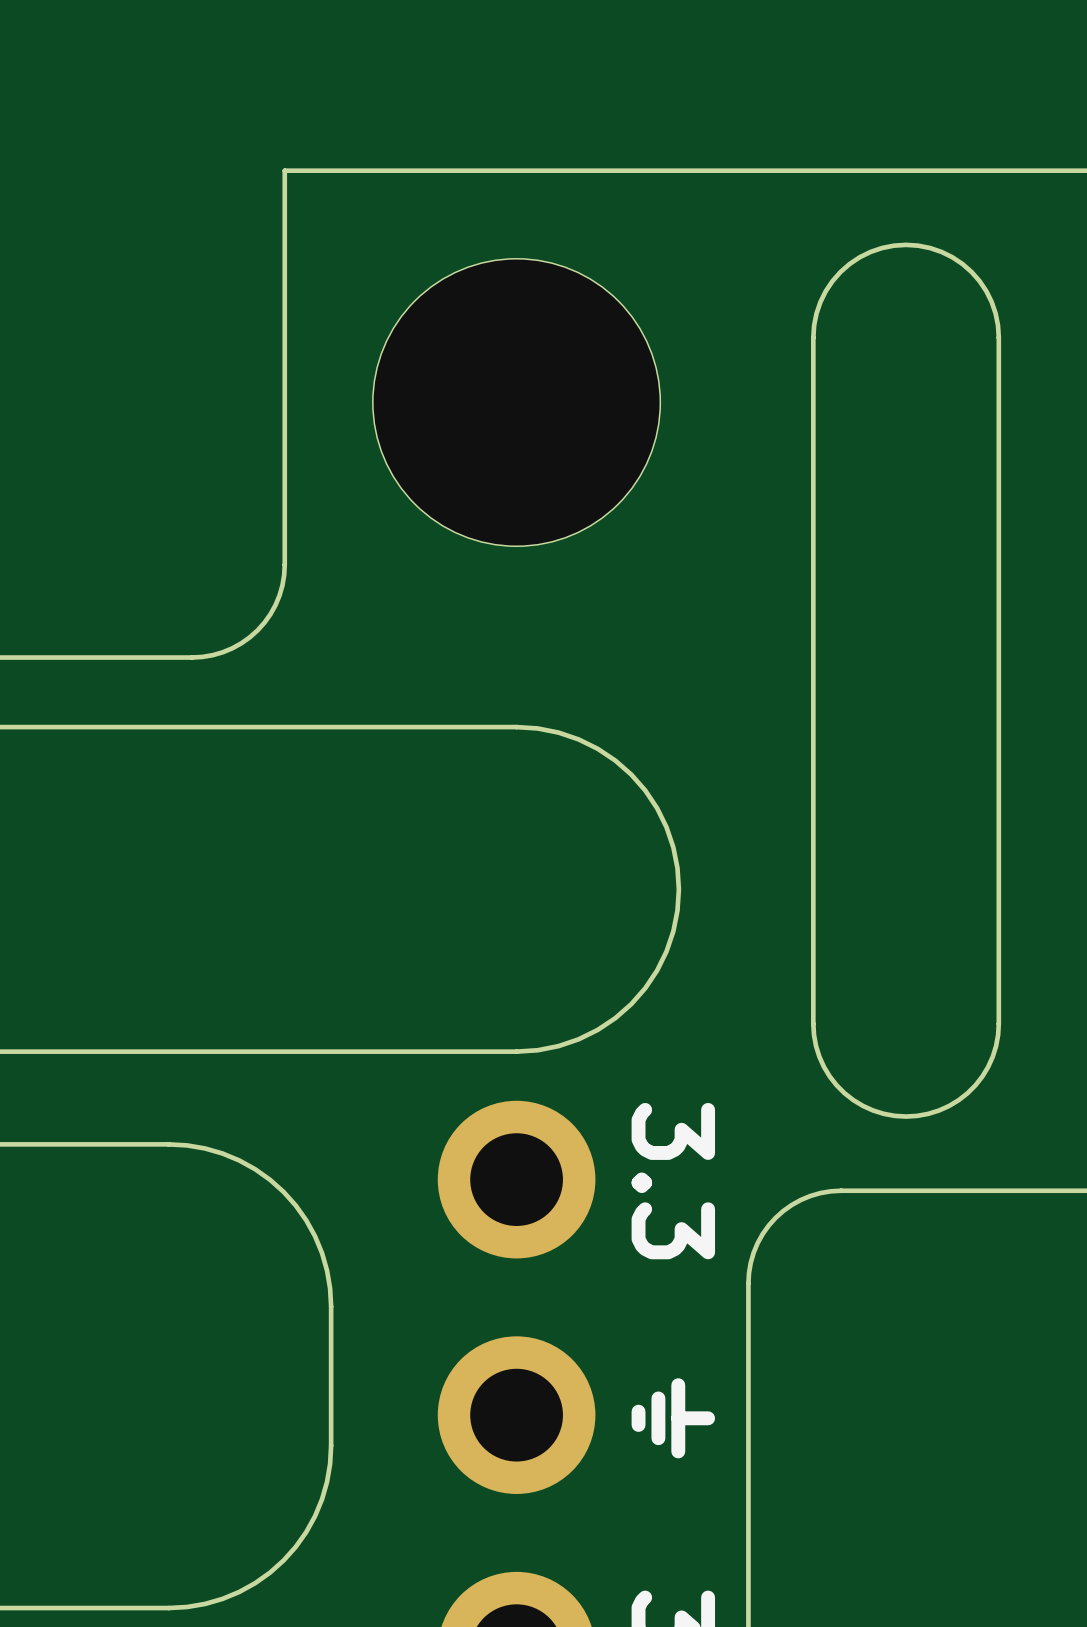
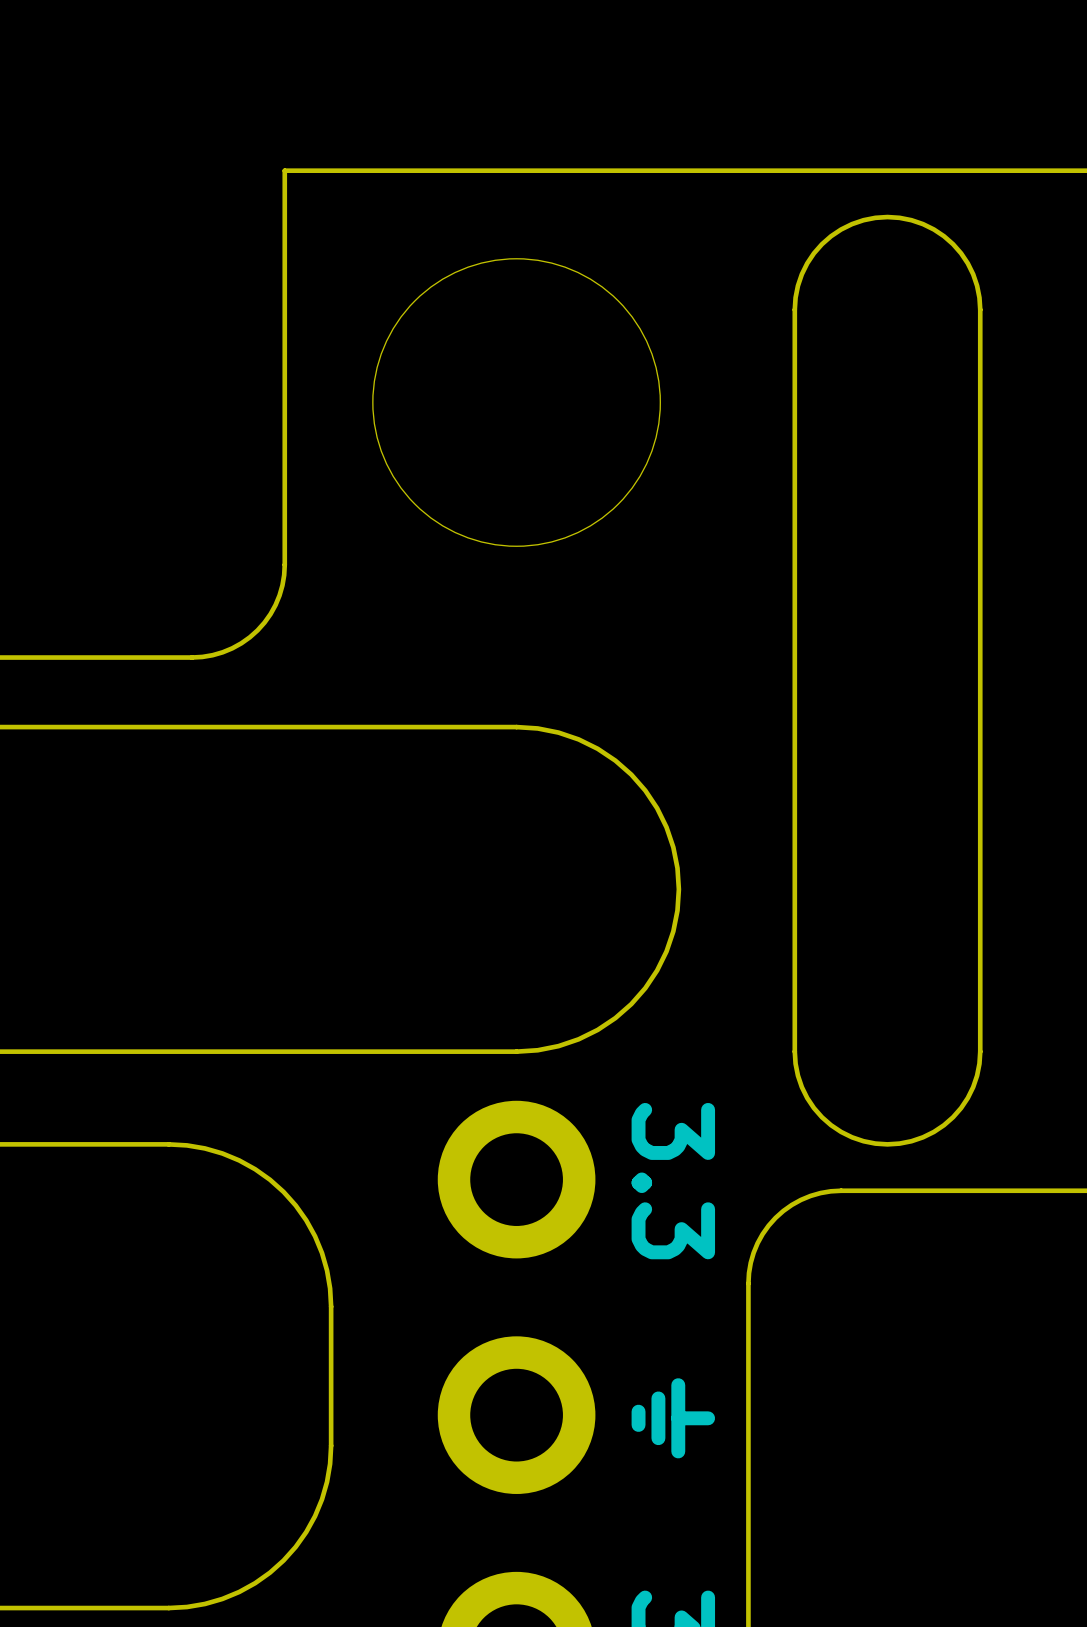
board edge: (998, 337) (998, 1035) (992, 1056) (982, 1076) (958, 1100) (928, 1113) (894, 1115) (862, 1105) (836, 1085) (823, 1066) (814, 1035) (814, 325) (820, 302) (825, 291) (832, 281) (849, 264) (859, 257) (882, 248) (906, 244) (930, 248) (941, 251) (952, 257) (971, 272) (979, 281) (991, 302) (998, 325) (998, 337) -> (980, 309) (979, 1063) (973, 1087) (967, 1098) (953, 1117) (943, 1125) (923, 1137) (911, 1141) (887, 1144) (875, 1143) (852, 1137) (831, 1125) (821, 1117) (813, 1108) (801, 1087) (795, 1063) (795, 297) (801, 274) (813, 253) (821, 244) (841, 229) (852, 224) (863, 220) (887, 217) (911, 220) (923, 224) (933, 229) (953, 244) (961, 253) (973, 274) (977, 285) (980, 309)

